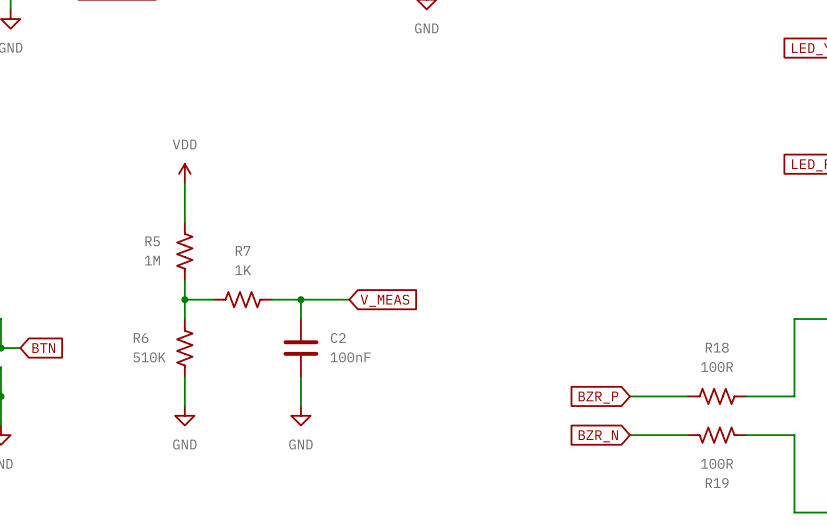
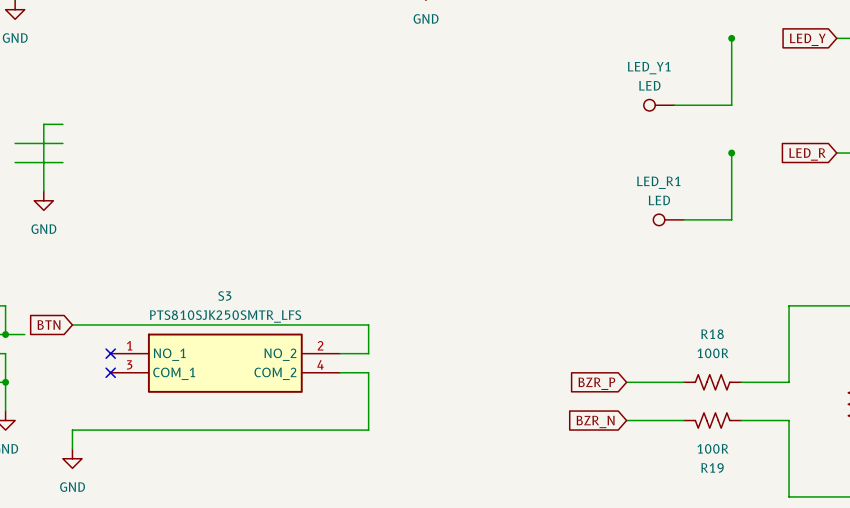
wire: none -> (731, 38) (731, 105) (674, 105)
junction: none -> (731, 38)
LED_Y1: none -> LED (659, 105)
wire: none -> (62, 124) (43, 124) (43, 191)
wire: none -> (15, 143) (62, 143)
wire: none -> (731, 153) (731, 219) (683, 219)
junction: none -> (731, 153)
wire: none -> (15, 162) (62, 162)
power symbol: VDD (184, 173) -> none
wire: (184, 183) (184, 222) -> none
power symbol: none -> GND (43, 200)
LED_R1: none -> LED (668, 219)
R5: 1M (184, 251) -> none
wire: (184, 280) (184, 319) -> none
wire: (184, 299) (213, 299) -> none
junction: (184, 299) -> none
R7: 1K (242, 299) -> none
wire: (271, 299) (349, 299) -> none
wire: (300, 299) (300, 319) -> none
junction: (300, 299) -> none
global label: V_MEAS (385, 300) -> none
wire: none -> (72, 324) (368, 324) (368, 353) (339, 353)
global label rotation: 0° (43, 348) -> 180° (49, 324)
R6: 510K (184, 348) -> none
C2: 100nF (300, 348) -> none
no-connect mark: none -> (110, 353)
S3: none -> PTS810SJK250SMTR_LFS (225, 363)
no-connect mark: none -> (110, 372)
wire: none -> (339, 372) (368, 372) (368, 430) (72, 430) (72, 449)
power symbol: GND (184, 415) -> none
power symbol: GND (300, 415) -> none
power symbol: none -> GND (72, 458)

